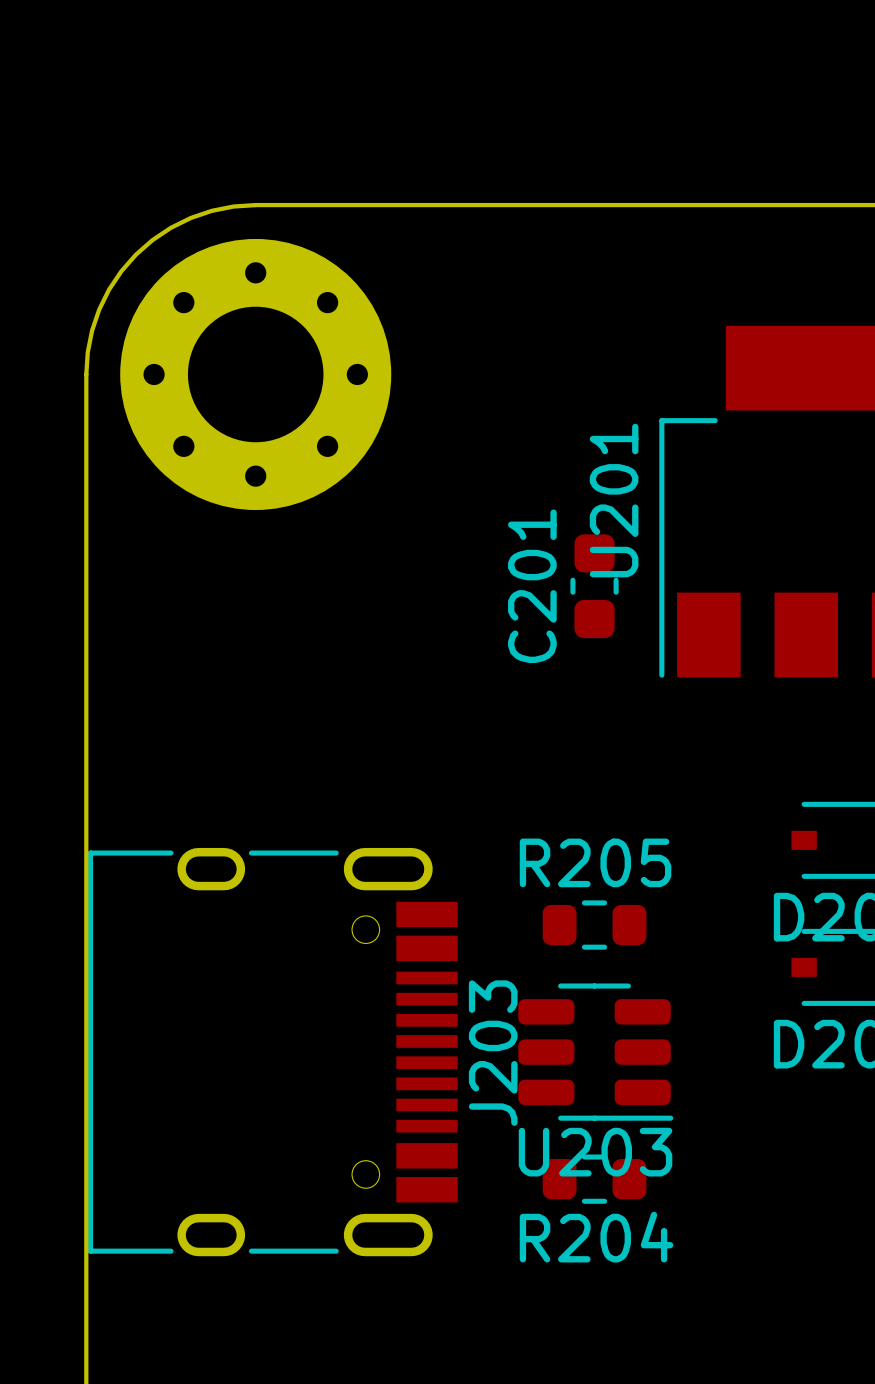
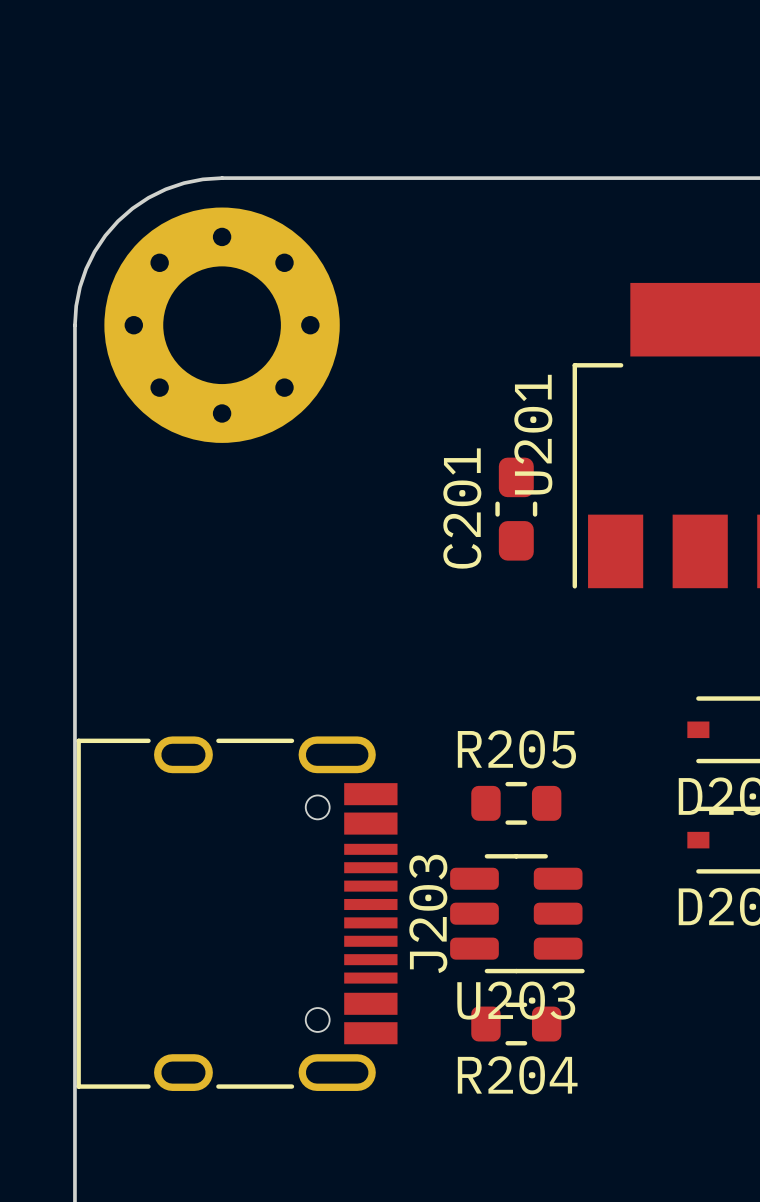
C201 footprint: [570, 534, 619, 639] -> [495, 457, 538, 561]

